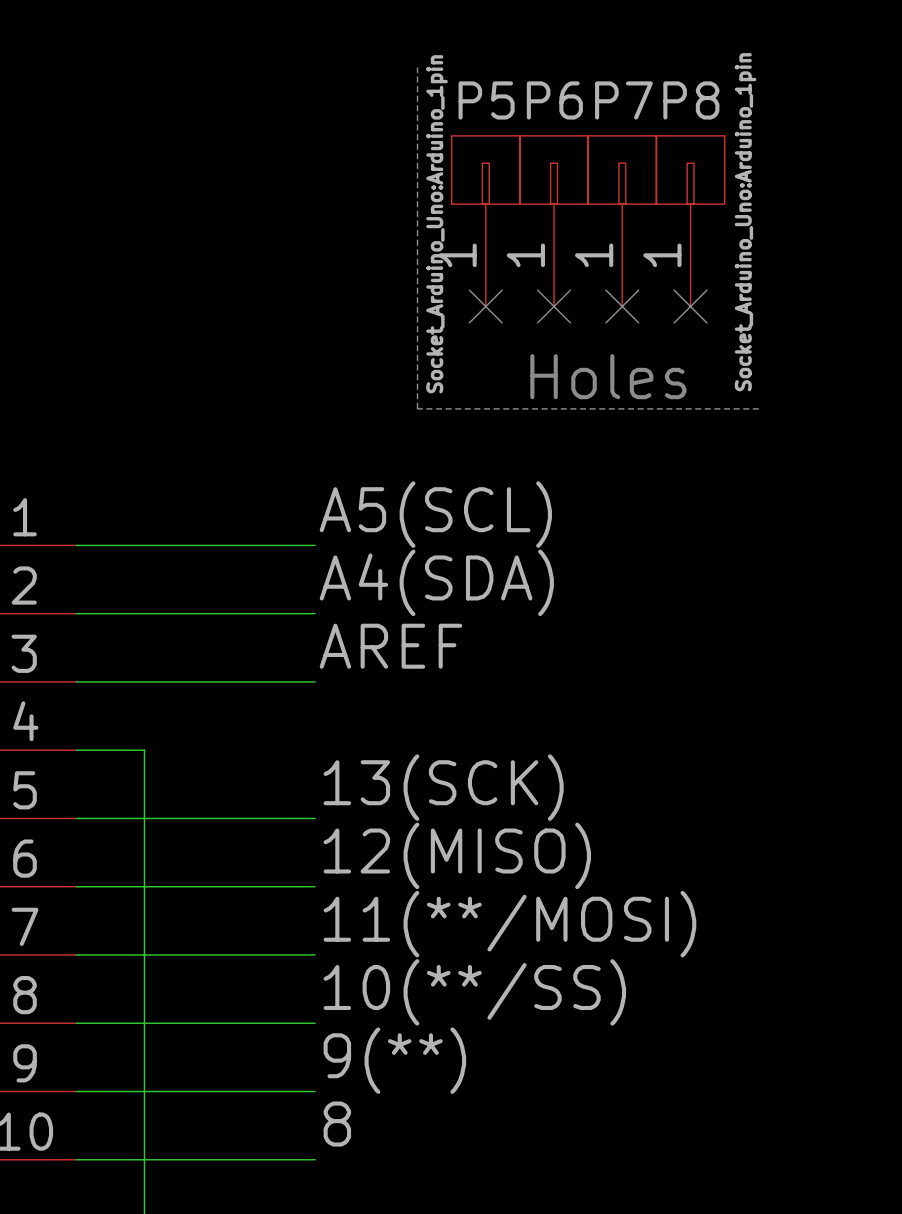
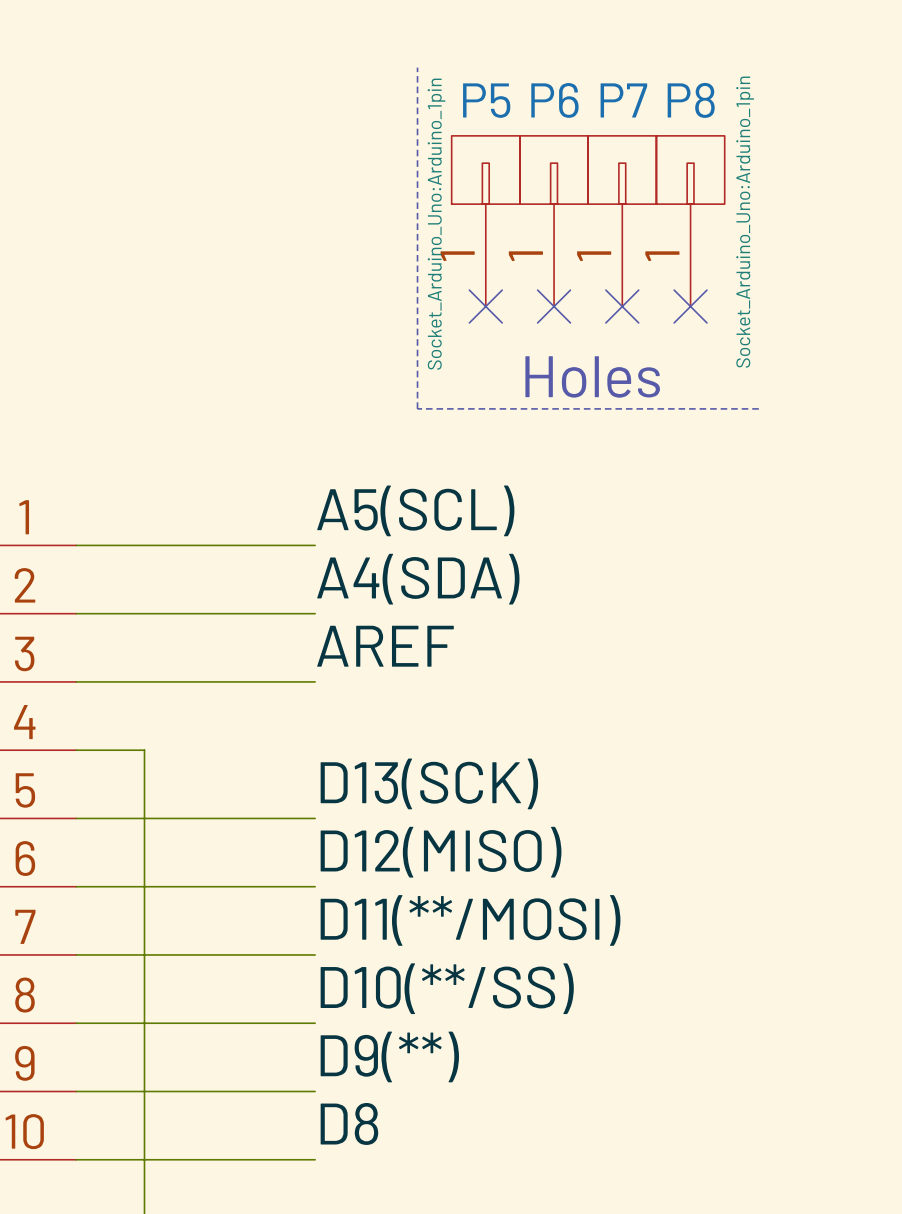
label: 13(SCK) (443, 787) -> D13(SCK) (429, 783)
label: 12(MISO) (457, 855) -> D12(MISO) (441, 852)
label: 11(**/MOSI) (509, 924) -> D11(**/MOSI) (470, 920)
label: 10(**/SS) (474, 992) -> D10(**/SS) (447, 988)
label: 9(**) (394, 1060) -> D9(**) (389, 1056)
label: 8 (337, 1124) -> D8 (349, 1123)

